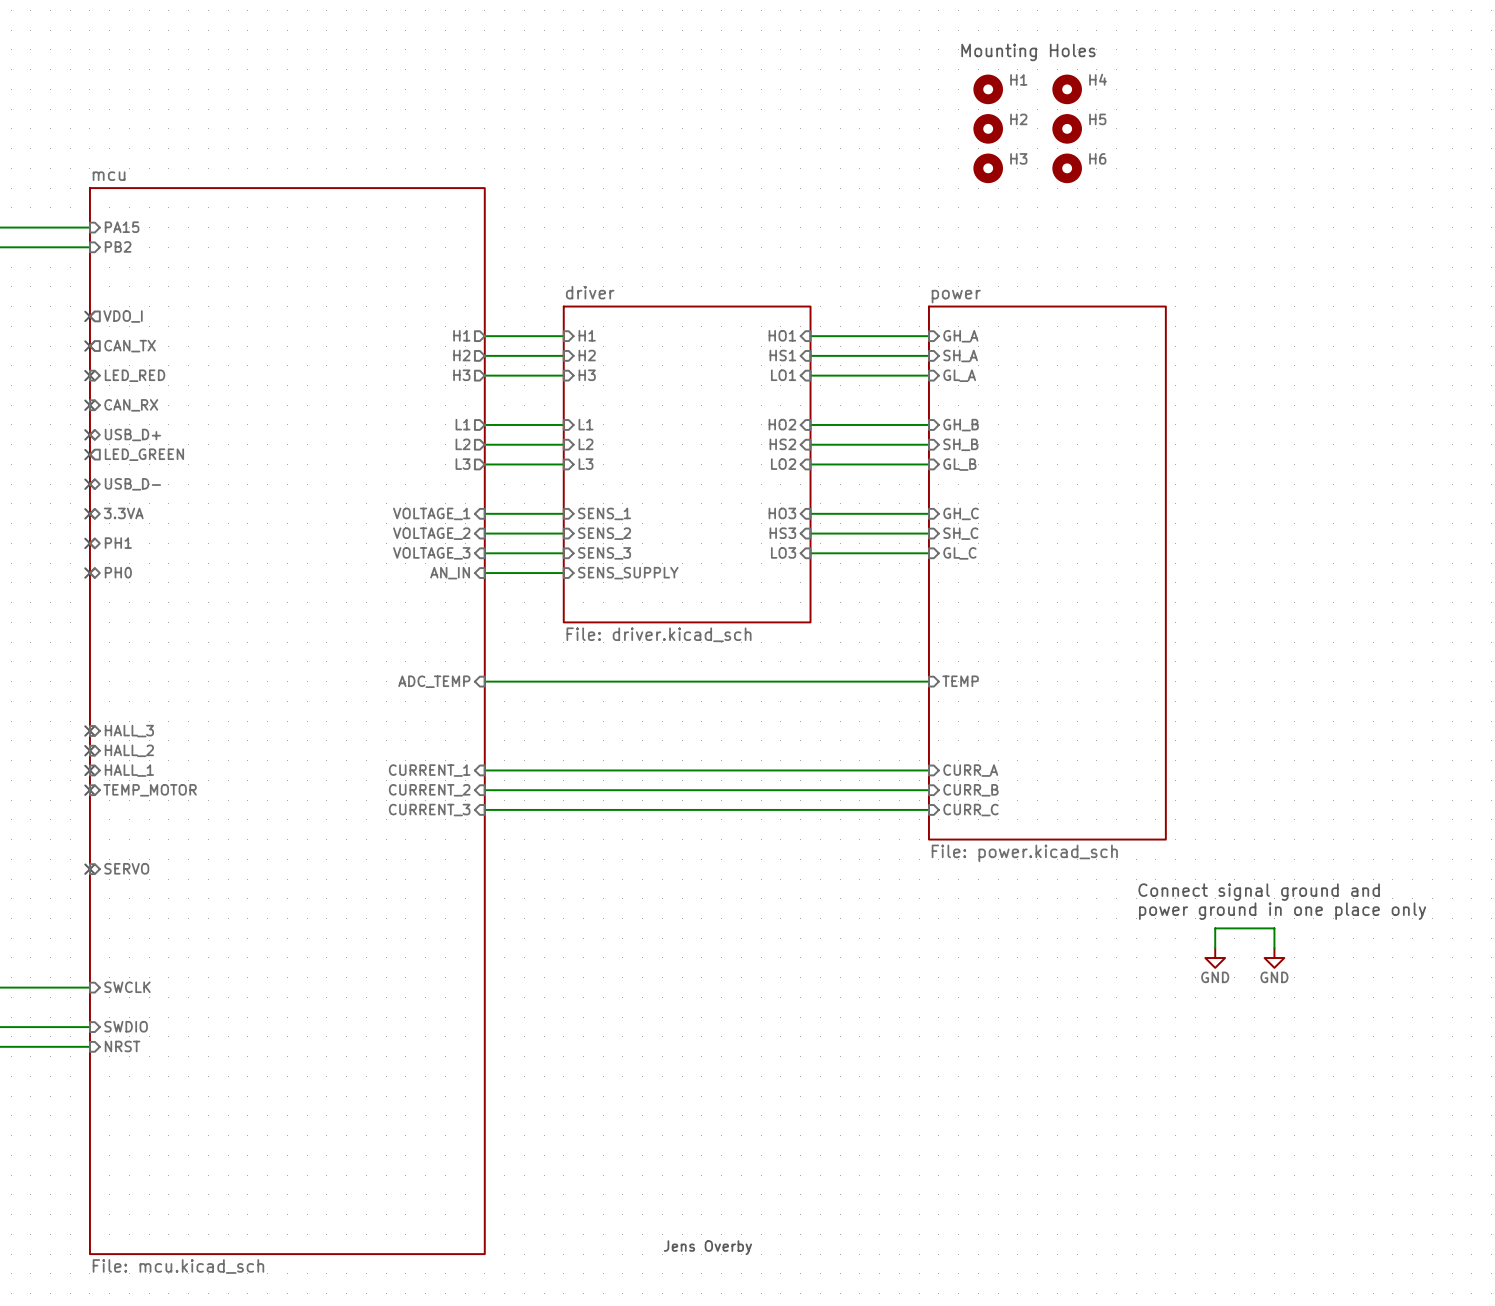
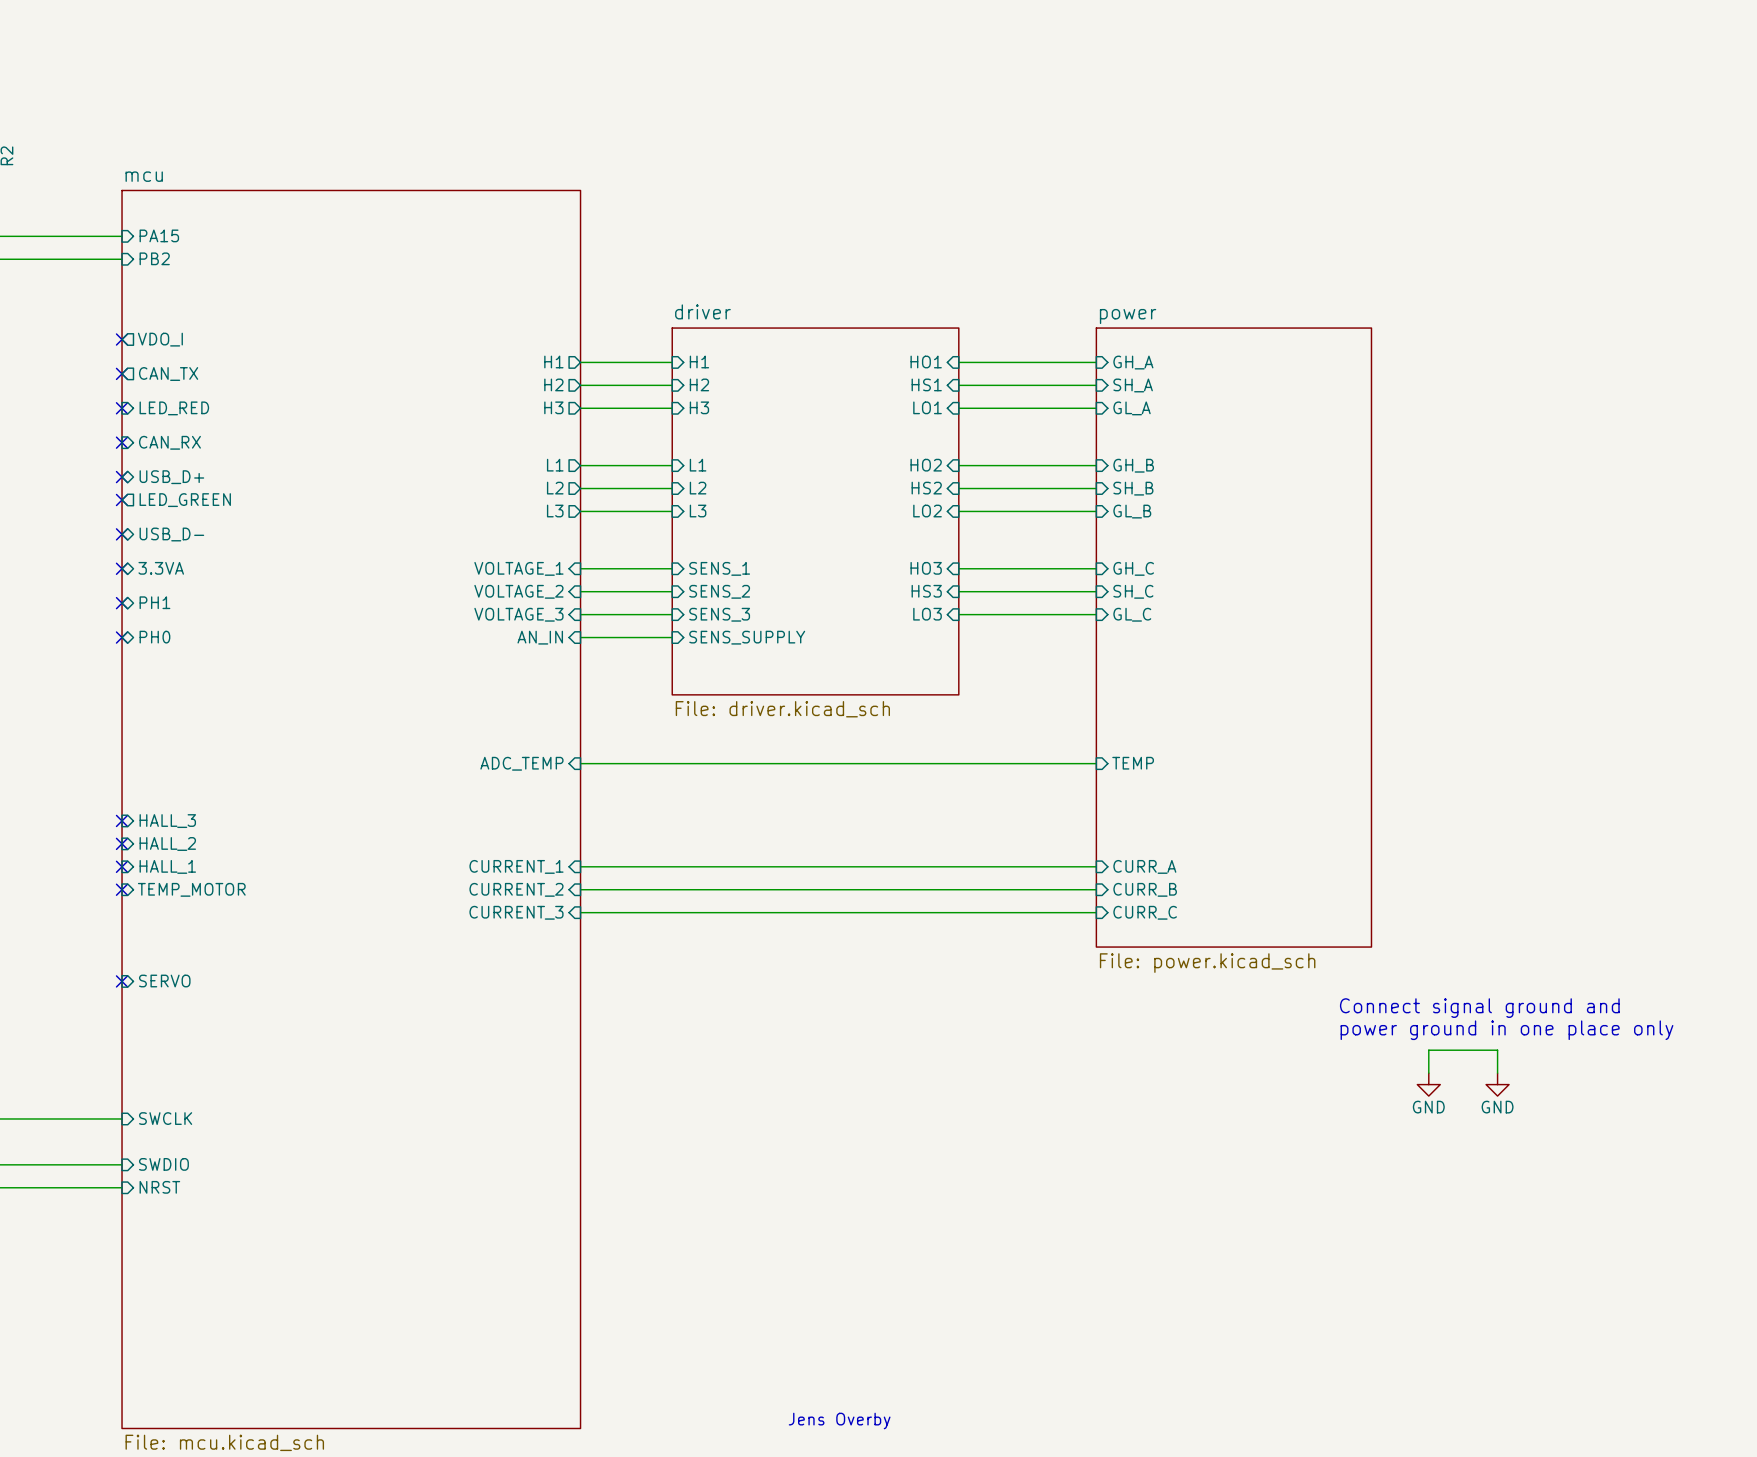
text: Mounting Holes (1028, 52) -> none
H1: (988, 89) -> none
H4: (1067, 89) -> none
H2: (988, 128) -> none
H5: (1067, 128) -> none
H3: (988, 168) -> none
H6: (1067, 168) -> none

